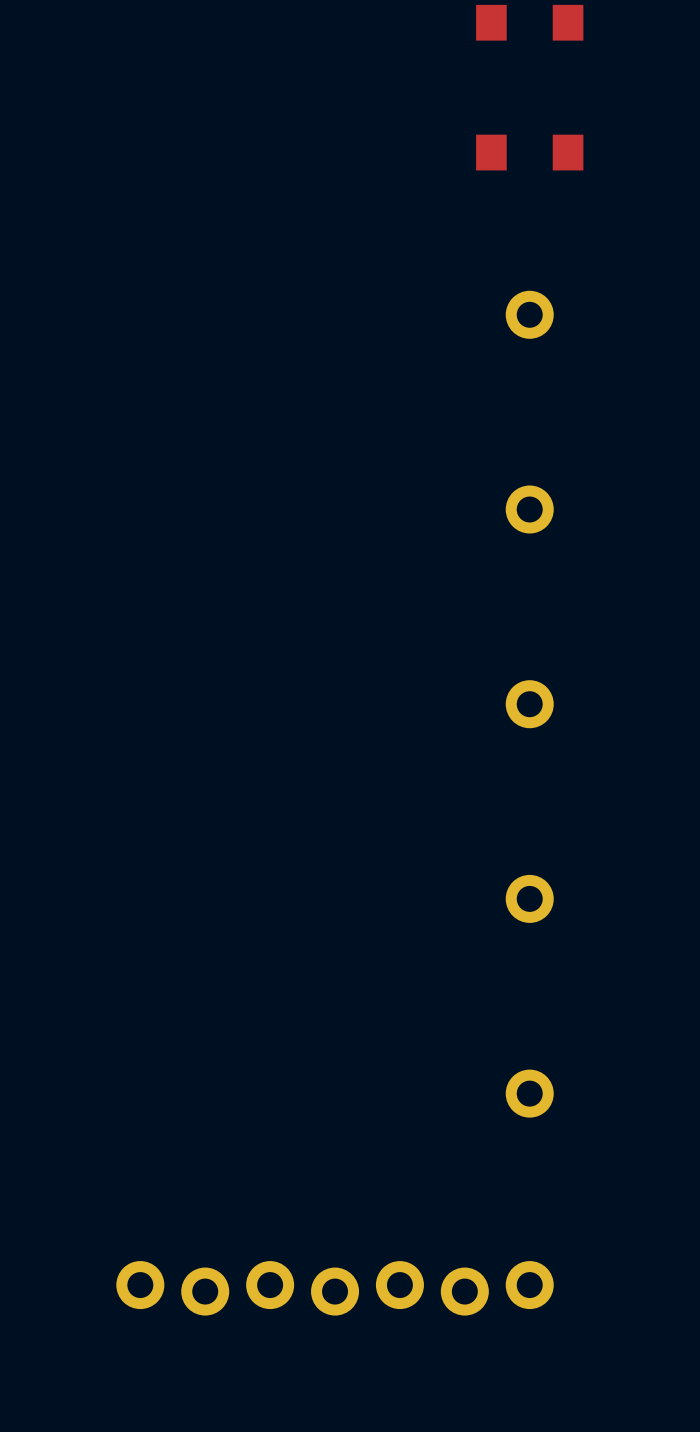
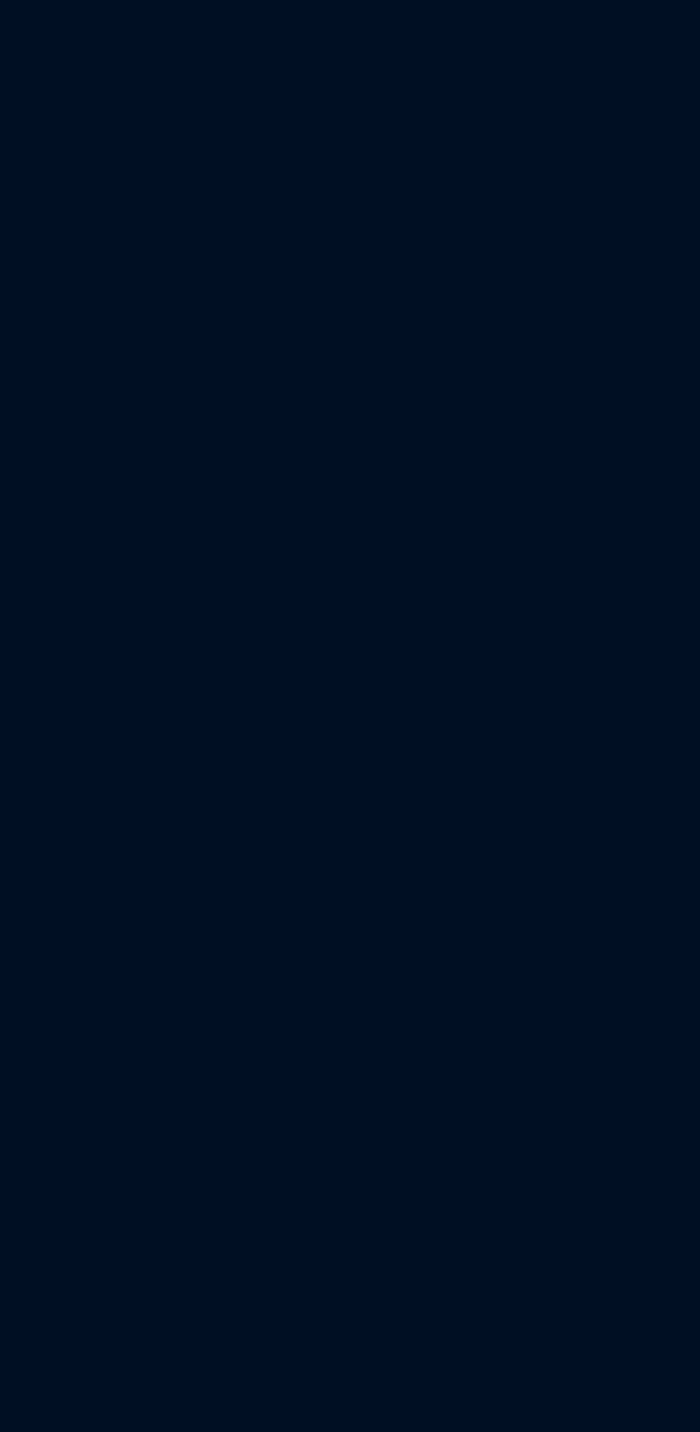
part: (529, 22) -> none
part: (529, 152) -> none
part: (529, 314) -> none
part: (529, 509) -> none
part: (529, 704) -> none
part: (529, 898) -> none
part: (529, 1093) -> none
part: (335, 1288) -> none

